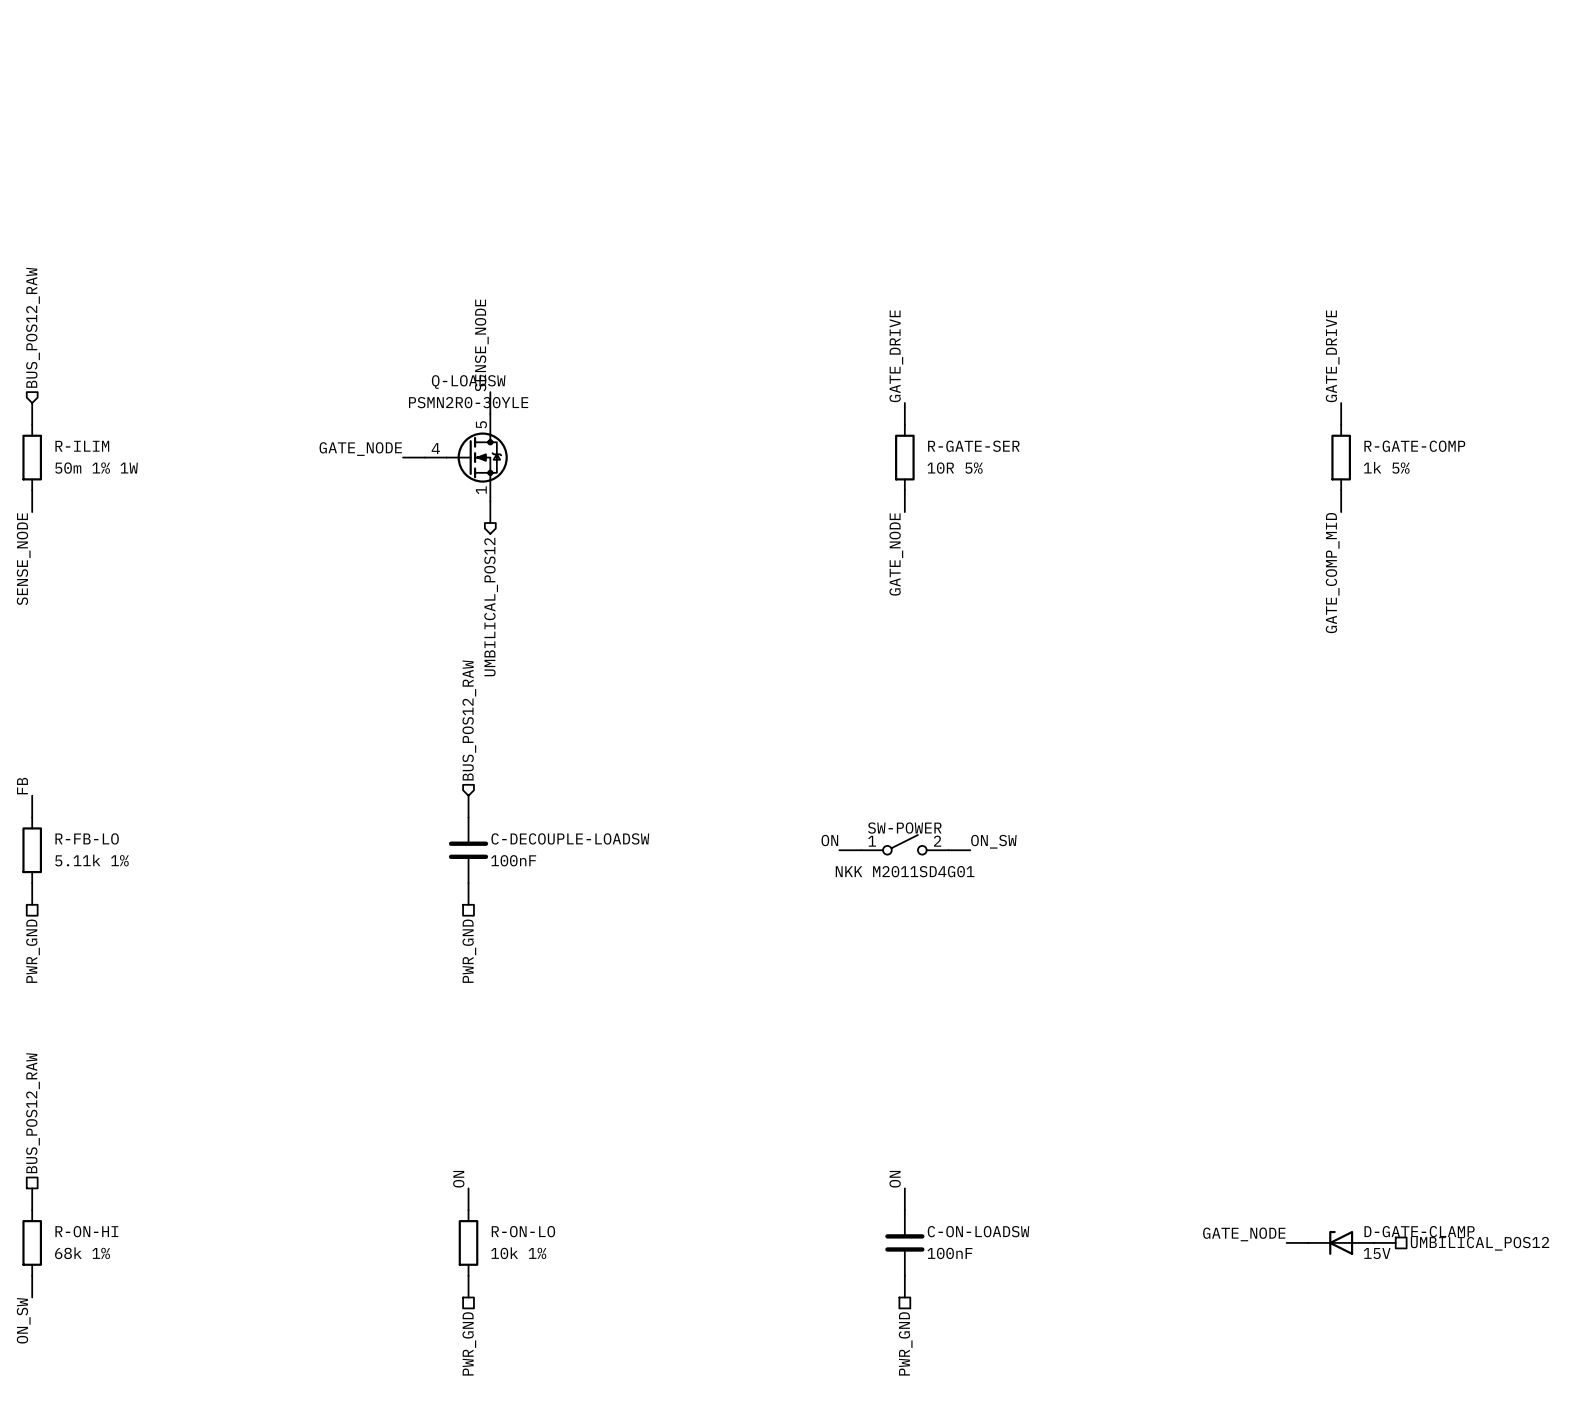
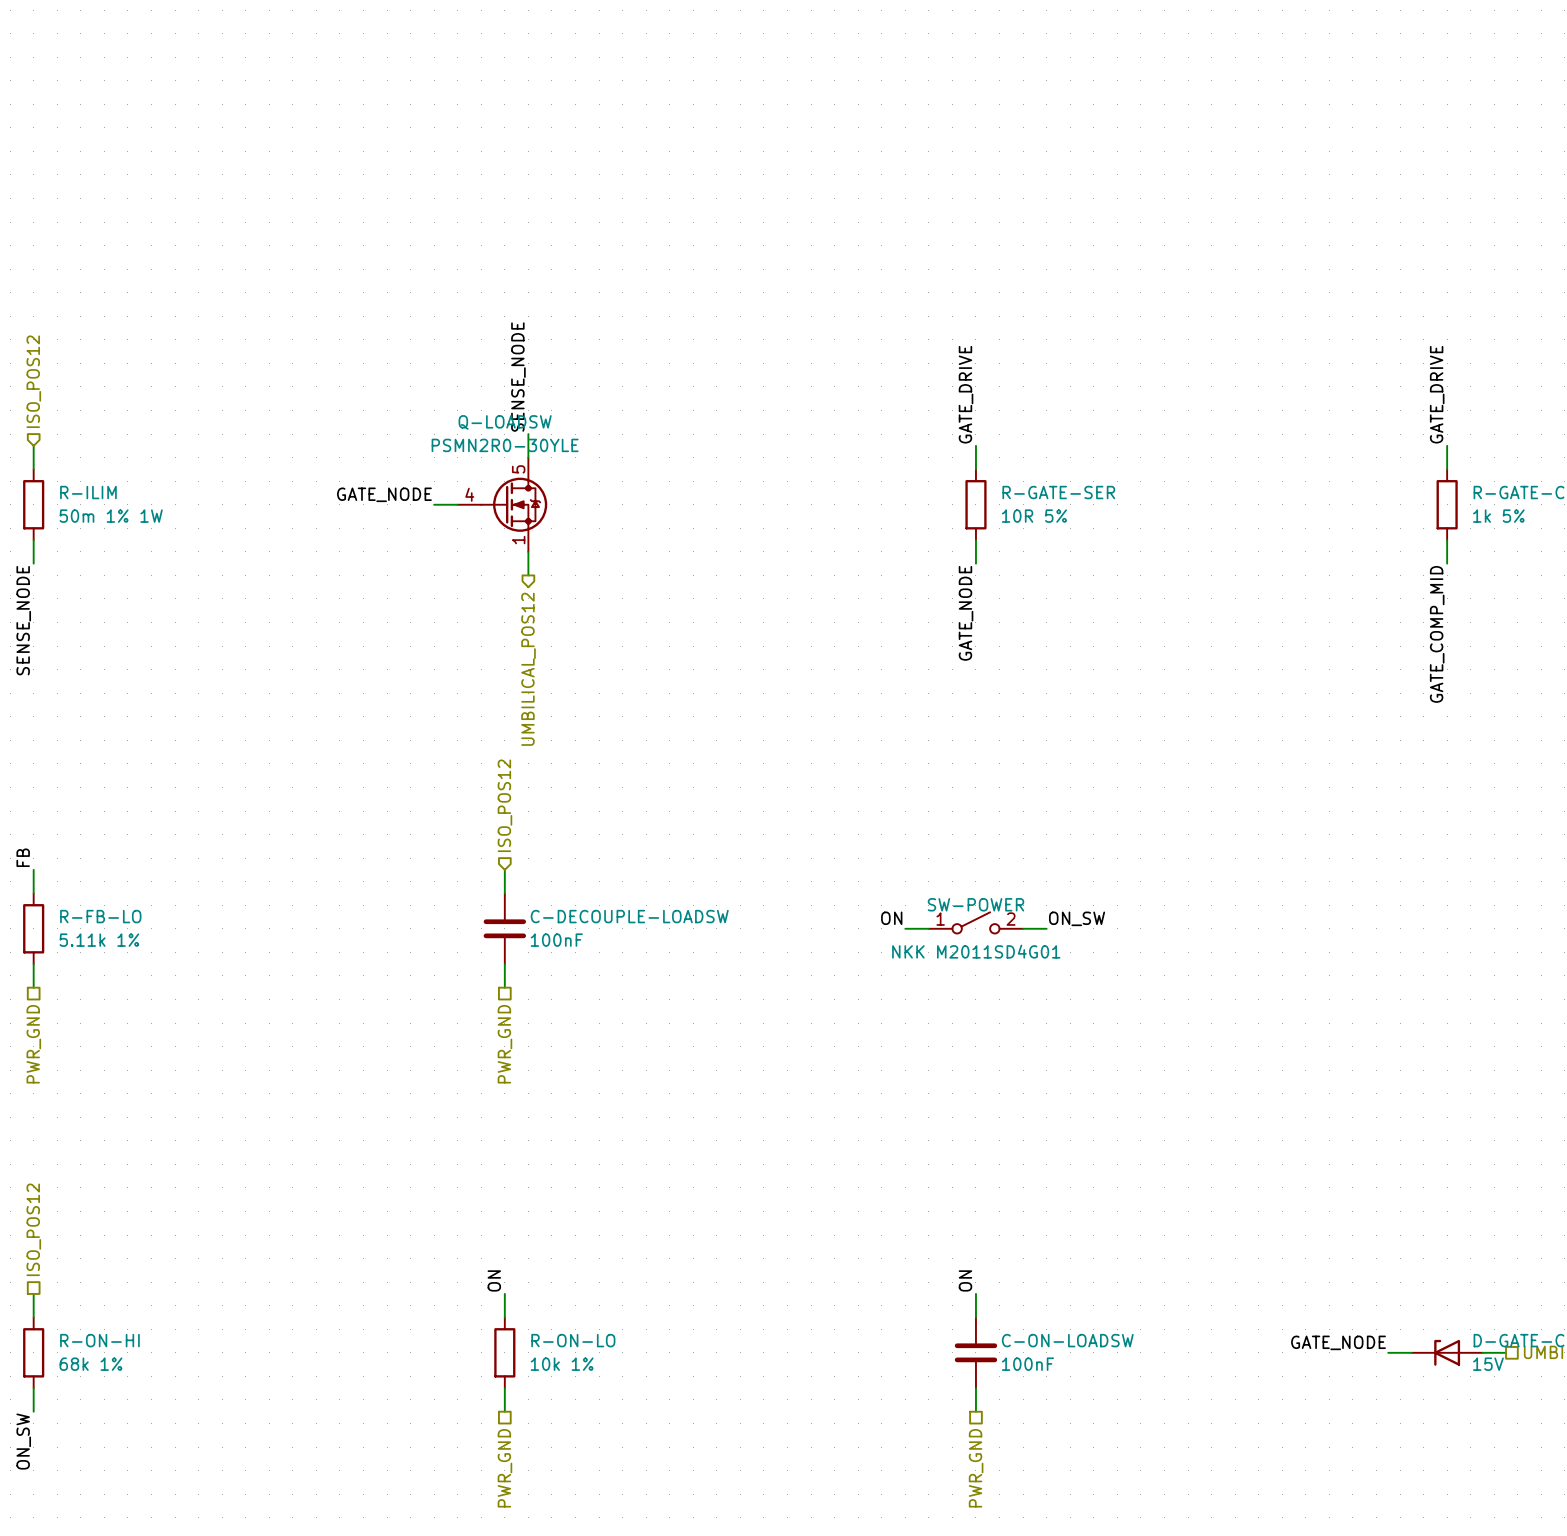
hierarchical label: BUS_POS12_RAW (33, 327) -> ISO_POS12 (33, 381)
hierarchical label: BUS_POS12_RAW (469, 720) -> ISO_POS12 (504, 805)
hierarchical label: BUS_POS12_RAW (33, 1113) -> ISO_POS12 (33, 1229)

